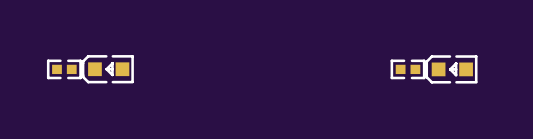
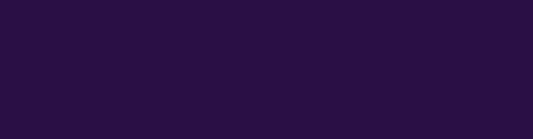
part: (64, 69) -> none
part: (107, 69) -> none
part: (408, 69) -> none
part: (451, 69) -> none

